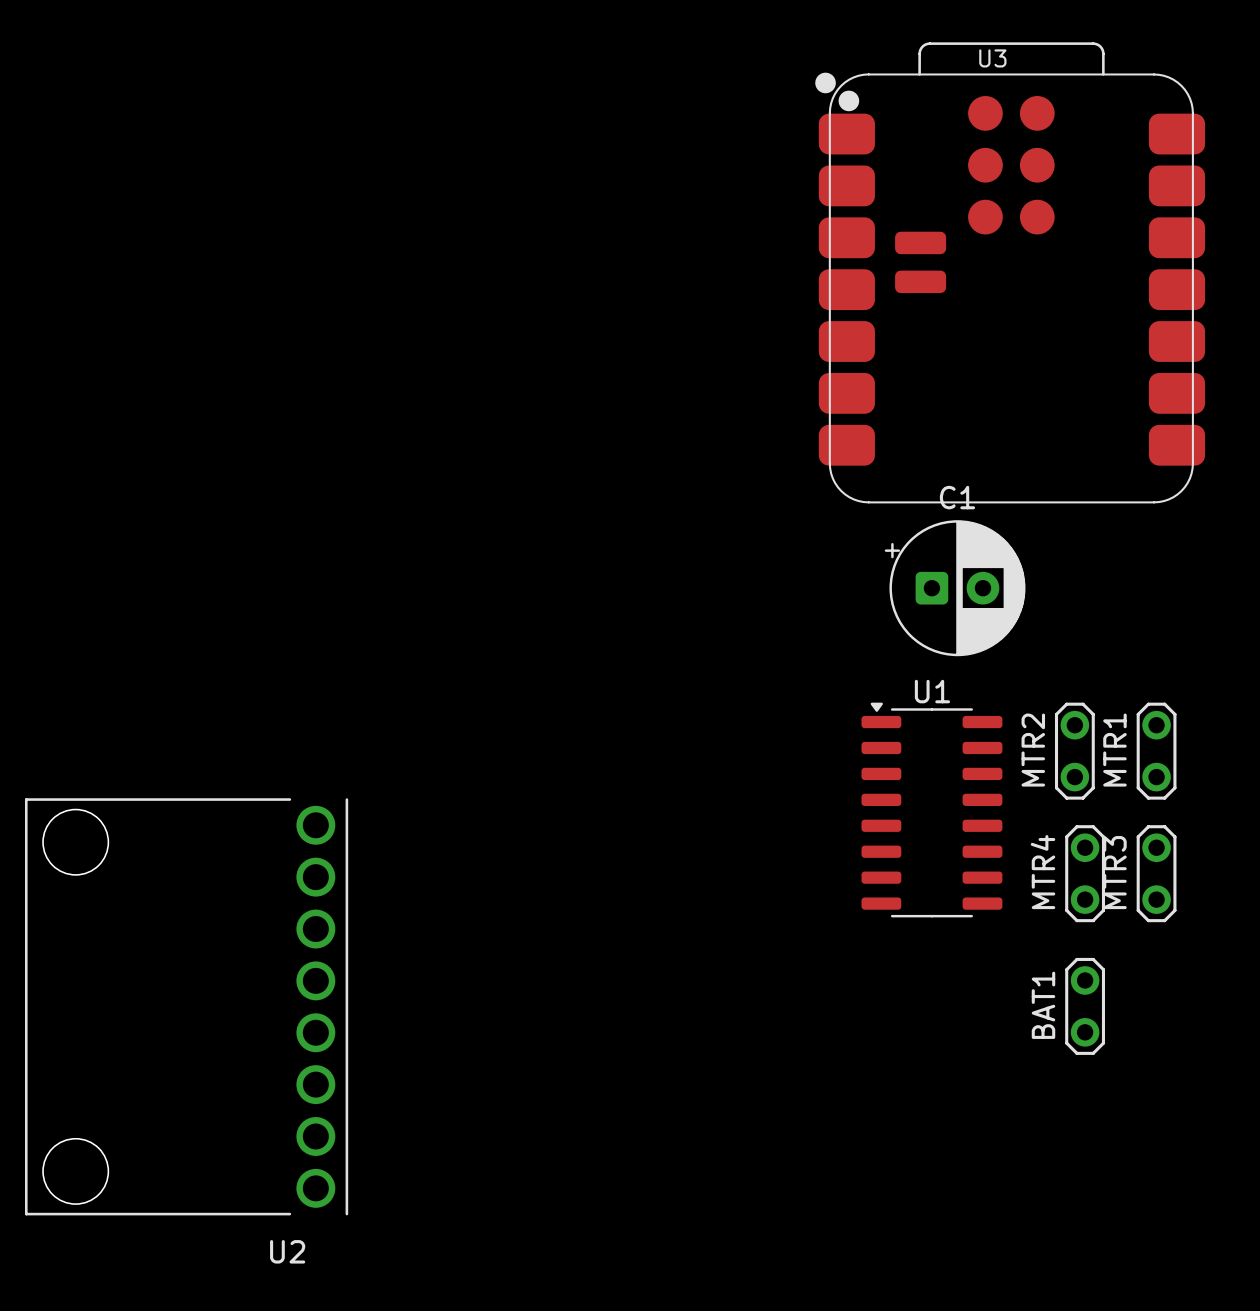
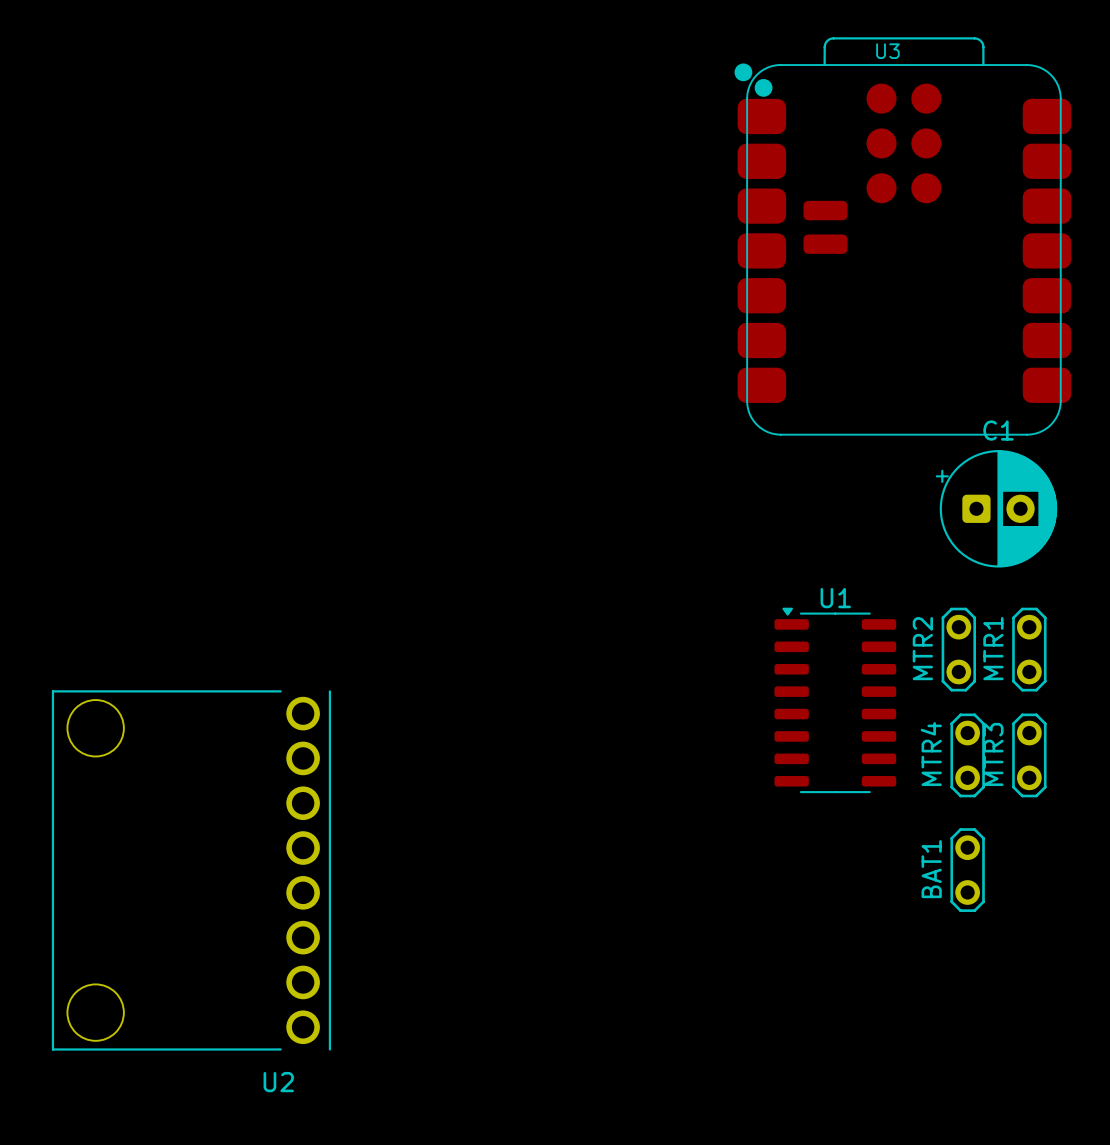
C1 position: (955, 588) -> (996, 508)

